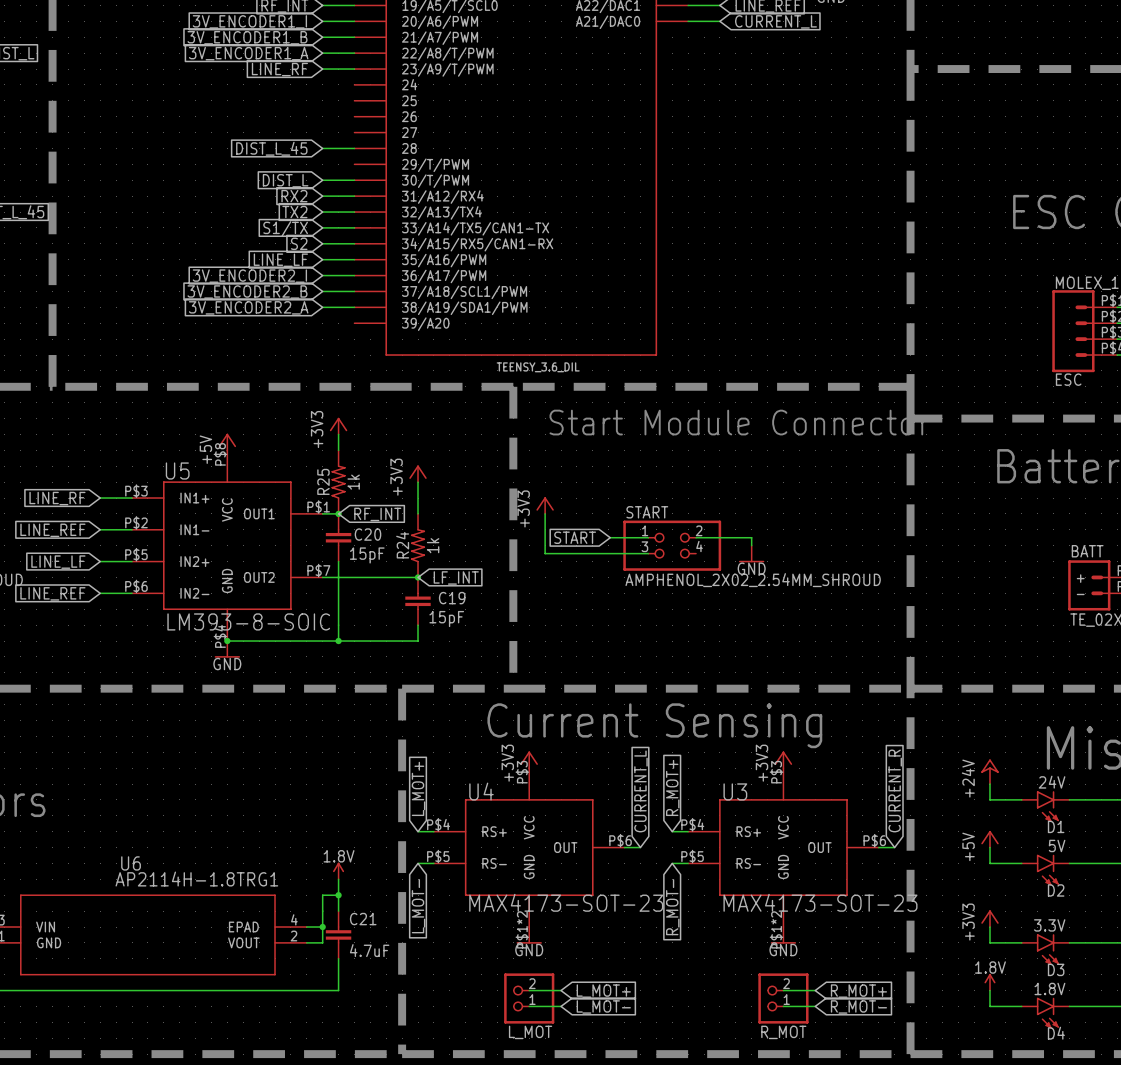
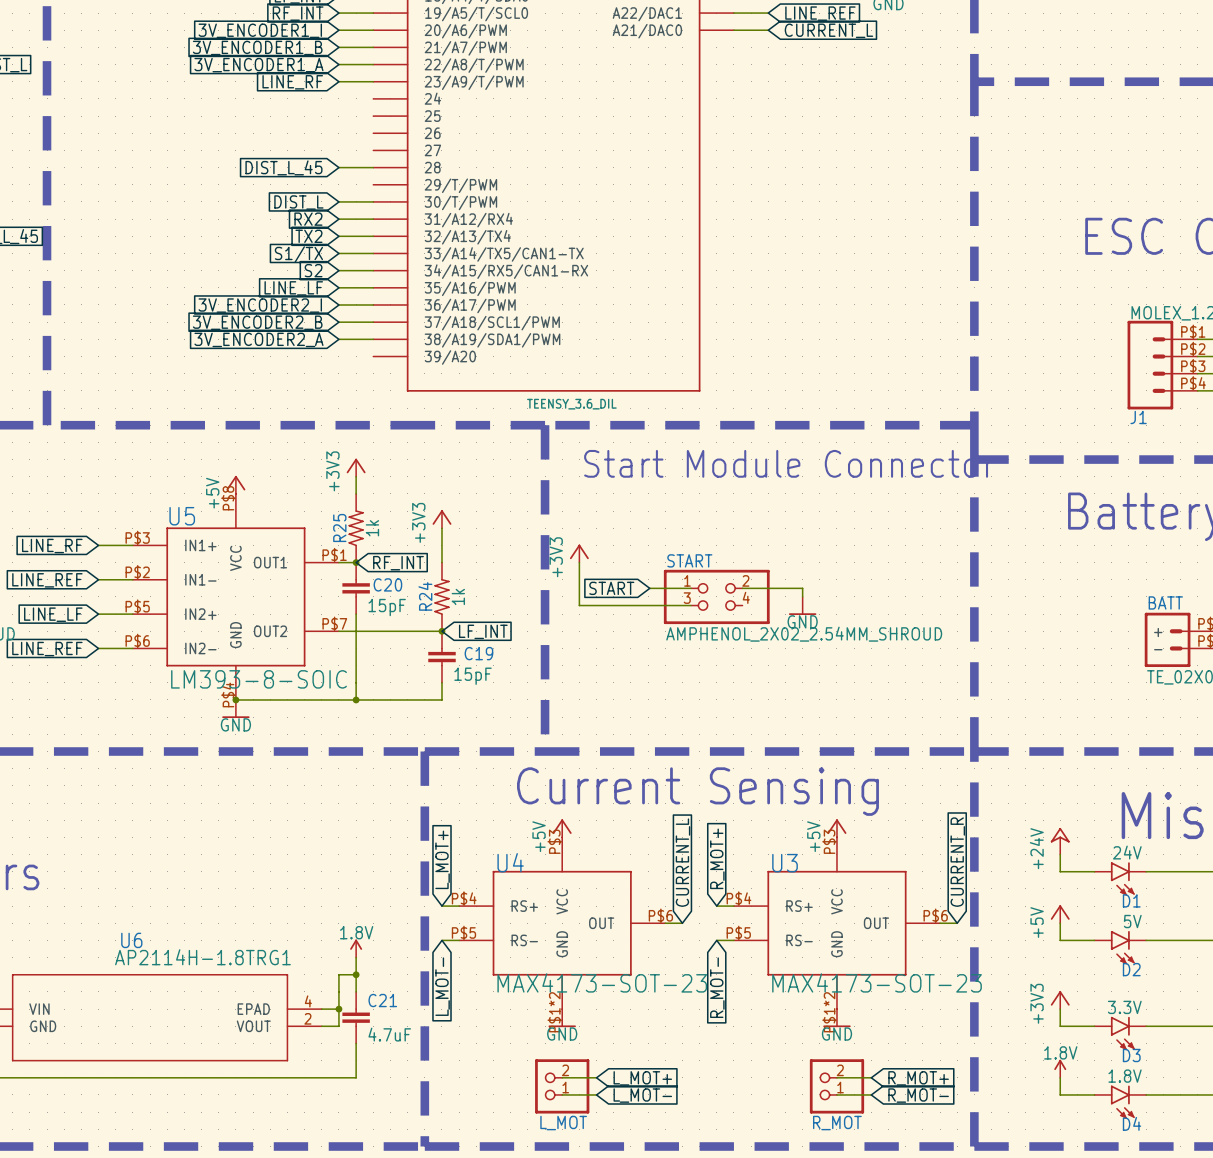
ESC name: ESC (1068, 379) -> J1 (1138, 417)
power symbol: +3V3 (529, 759) -> +5V (562, 828)
power symbol: +3V3 (783, 759) -> +5V (836, 828)

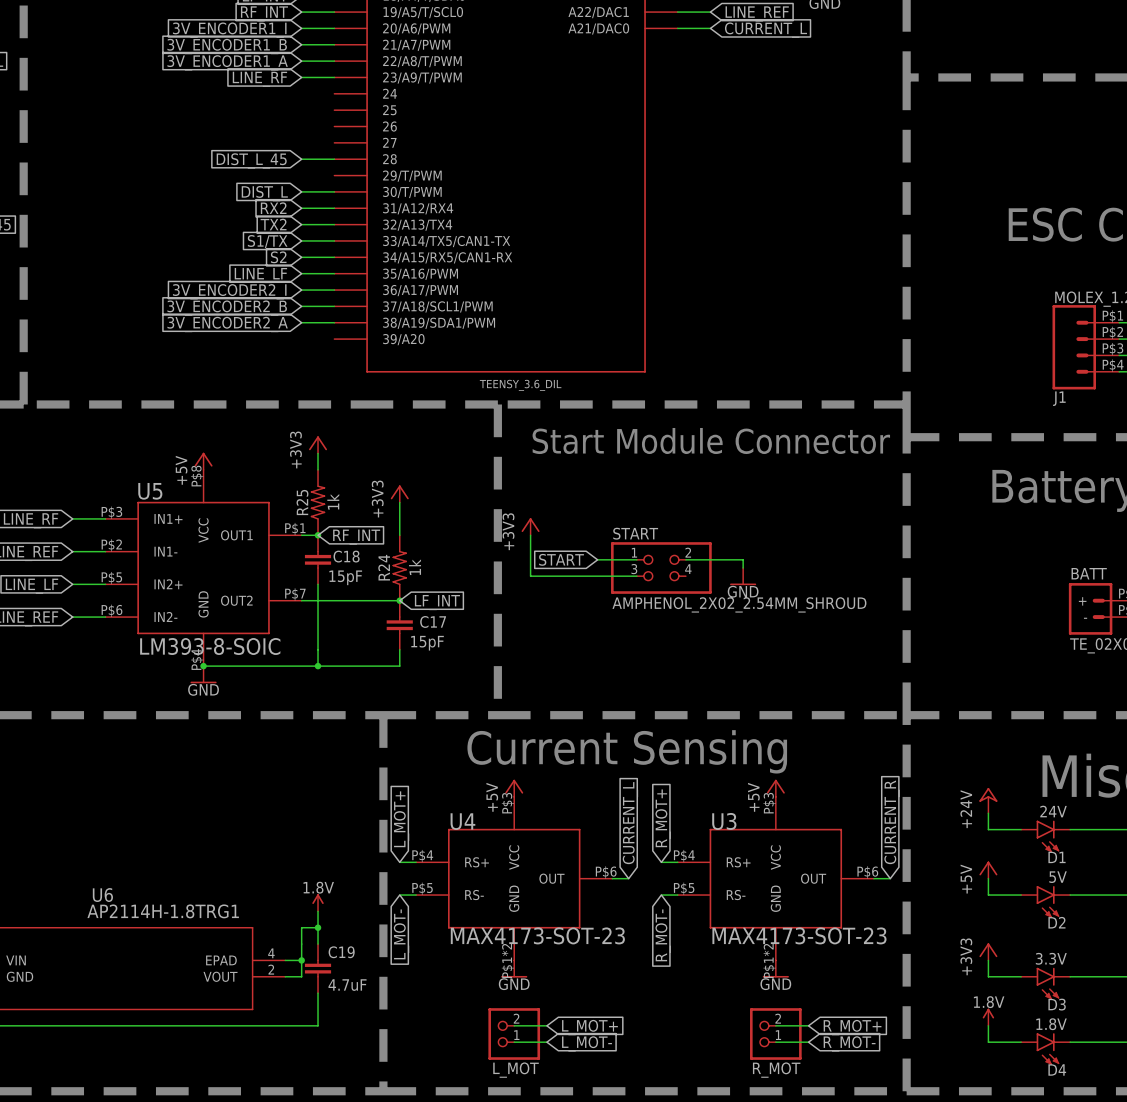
C20 name: C20 (387, 584) -> C18 (346, 556)
C19 name: C19 (478, 653) -> C17 (433, 621)
C21 name: C21 (382, 1000) -> C19 (341, 952)

